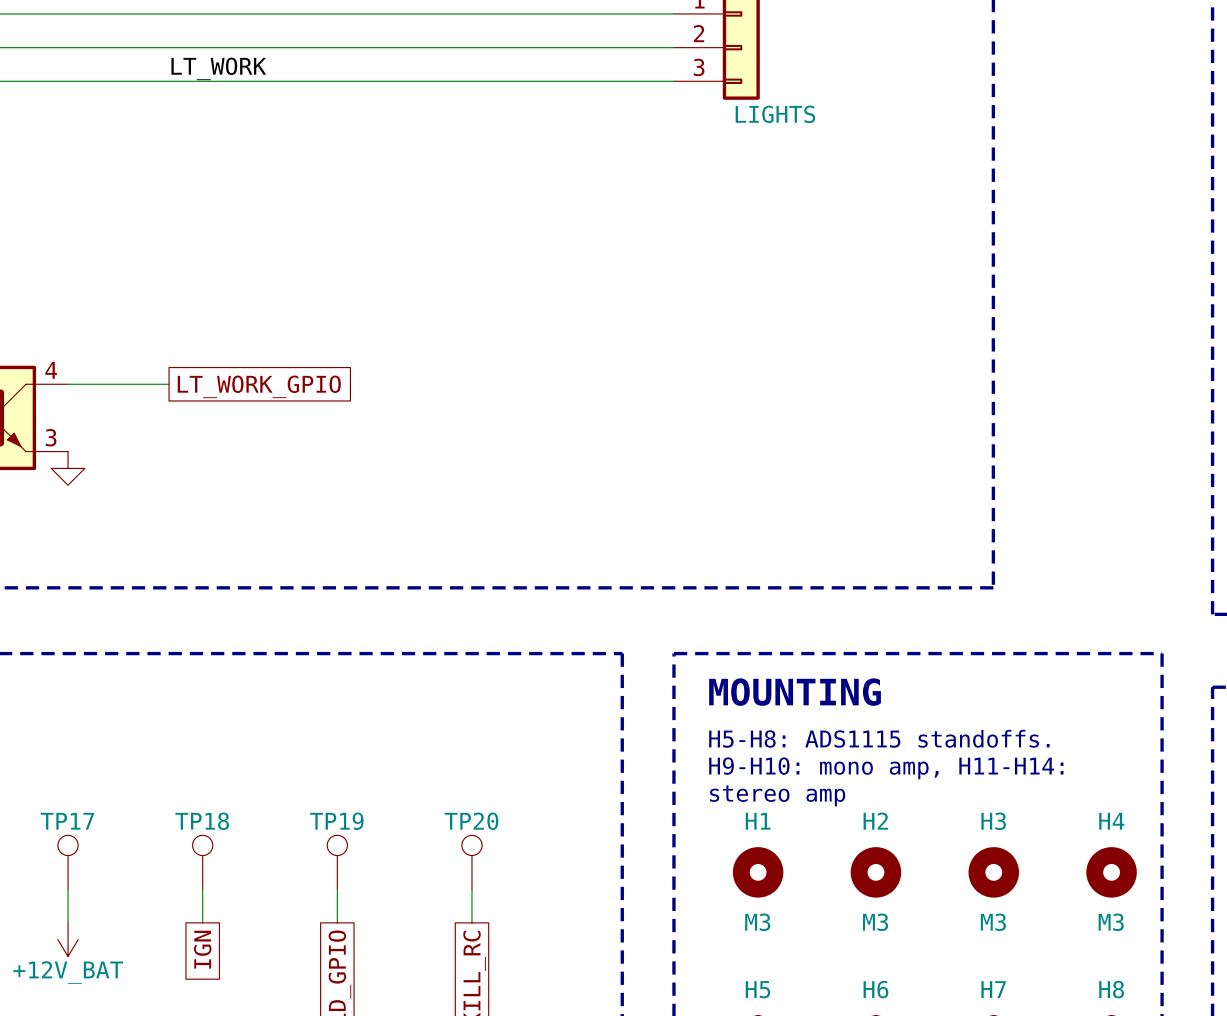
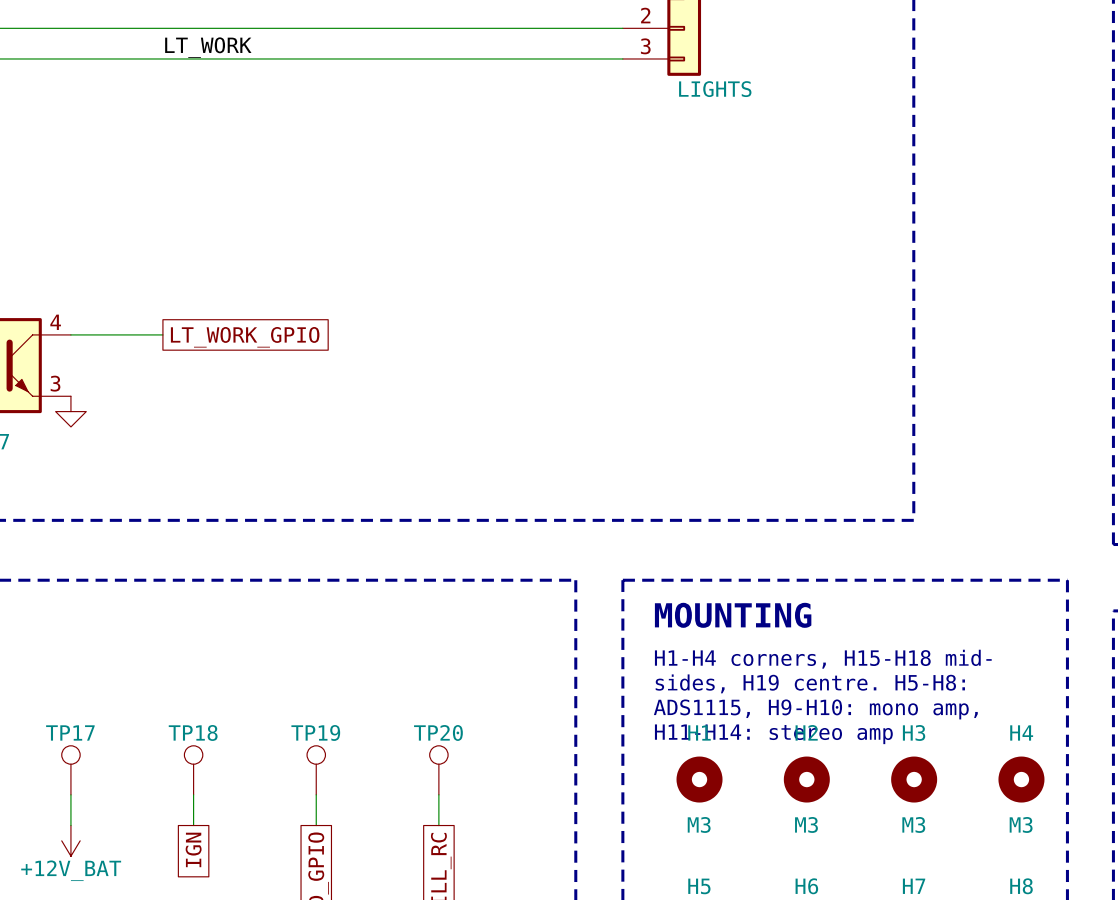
text: H5-H8: ADS1115 standoffs. (879, 738) -> H1-H4 corners, H15-H18 mid- (823, 659)
text: H9-H10: mono amp, H11-H14: (886, 768) -> sides, H19 centre. H5-H8: (810, 683)
text: stereo amp (777, 795) -> ADS1115, H9-H10: mono amp, (815, 709)
text: none -> H11-H14: stereo amp (773, 734)

